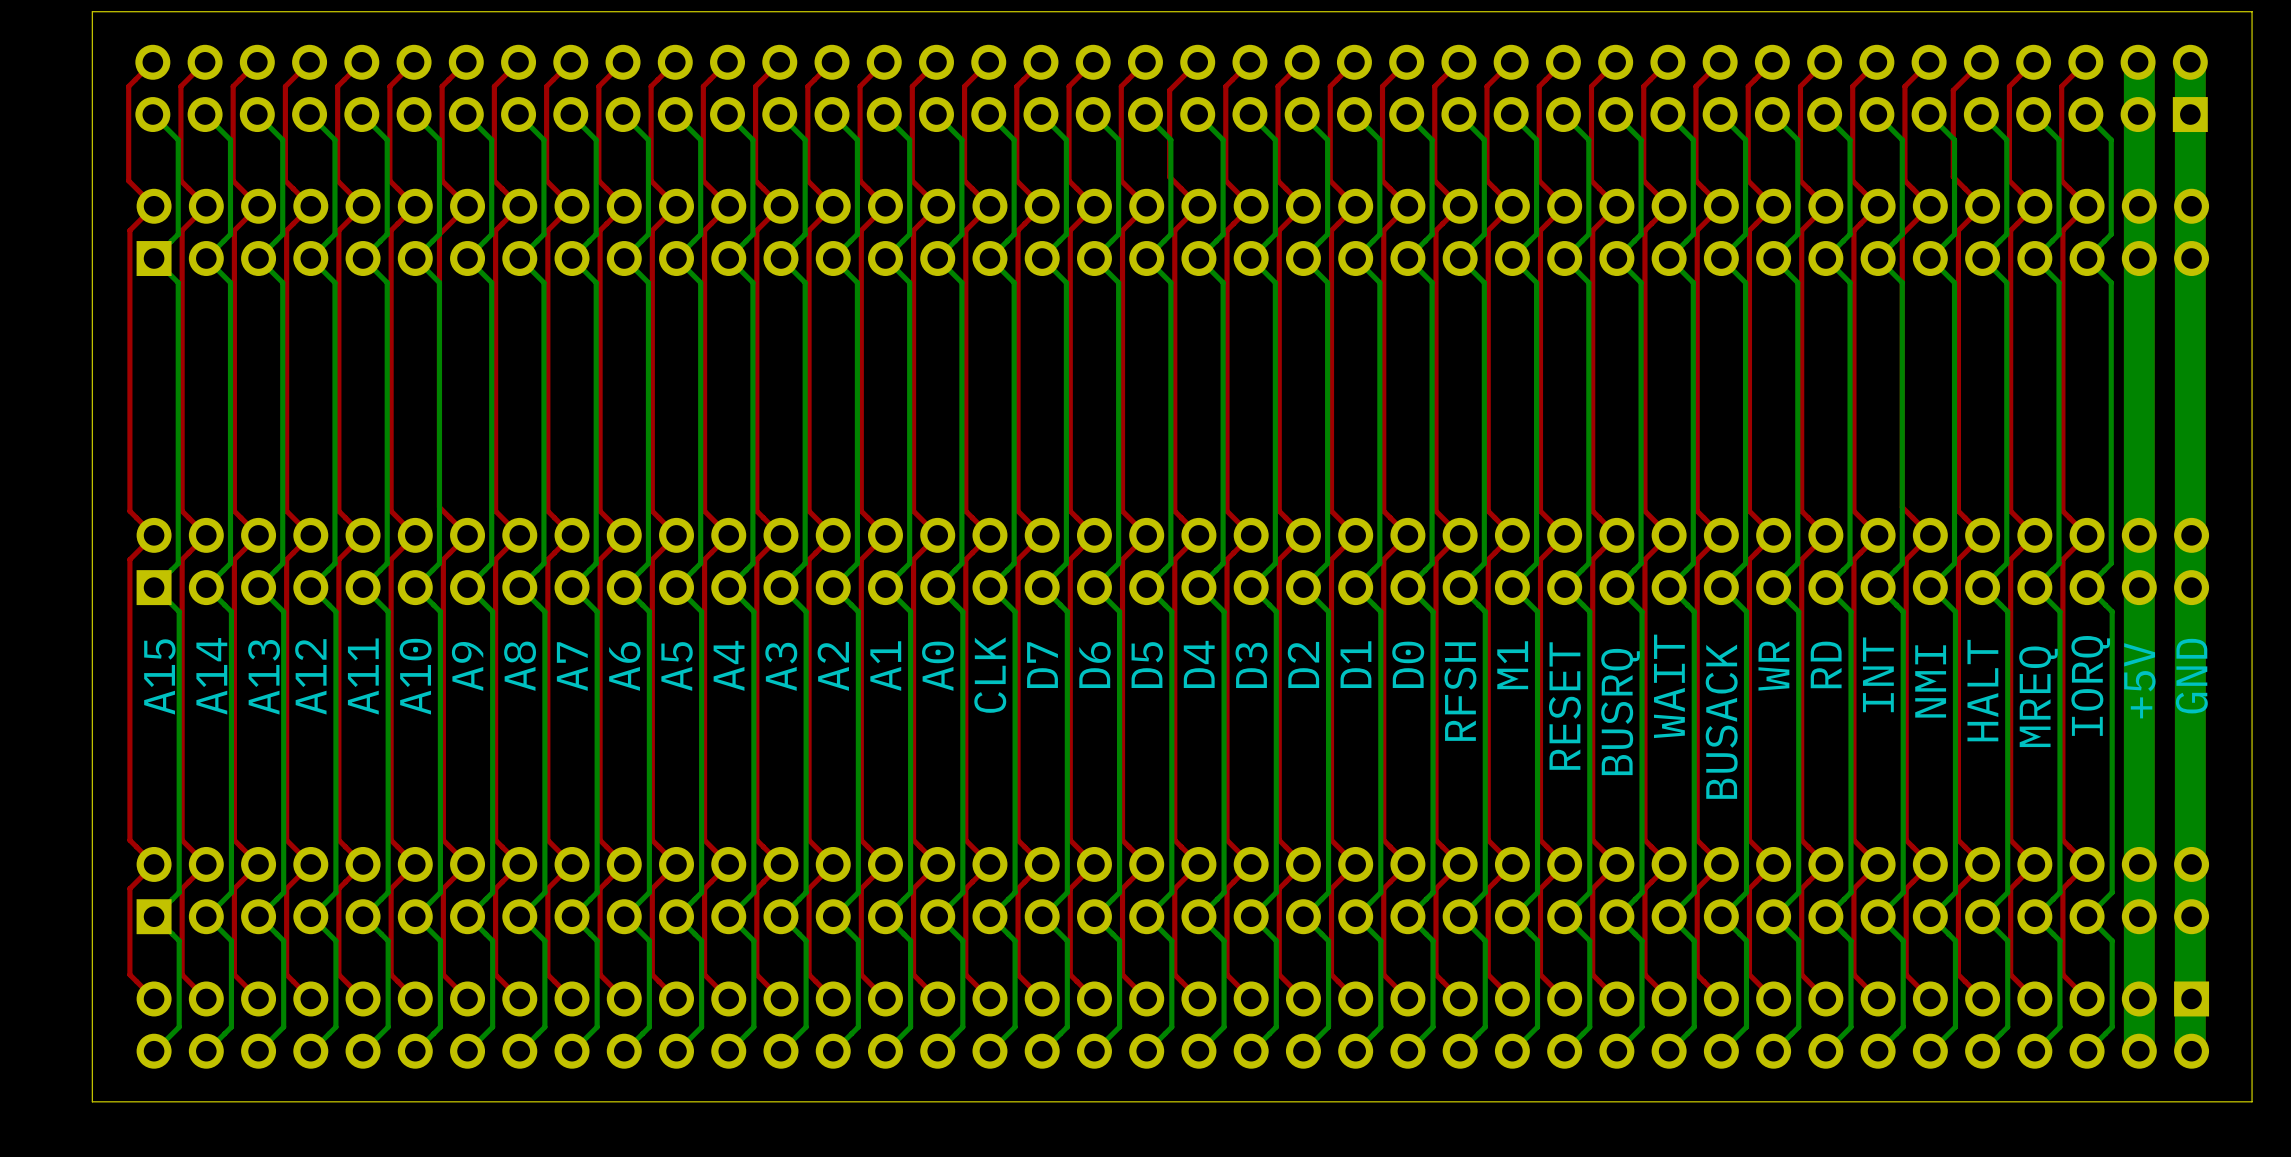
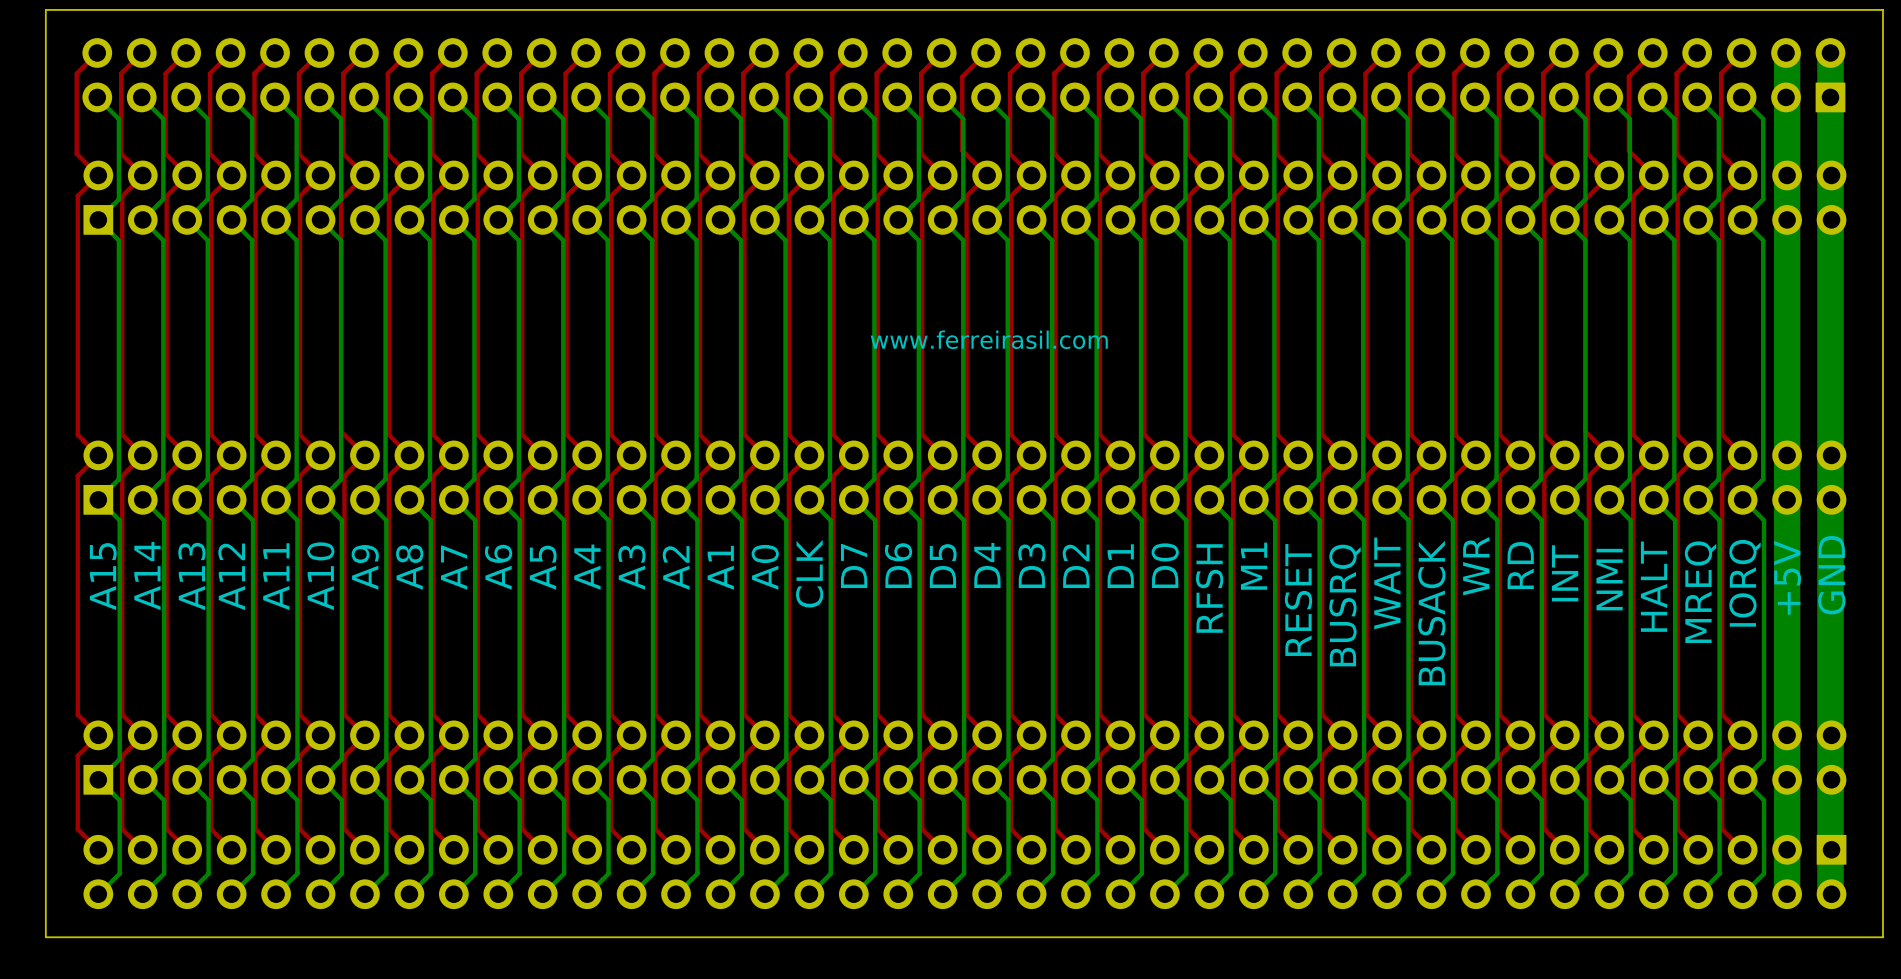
text: none -> www.ferreirasil.com (989, 339)

